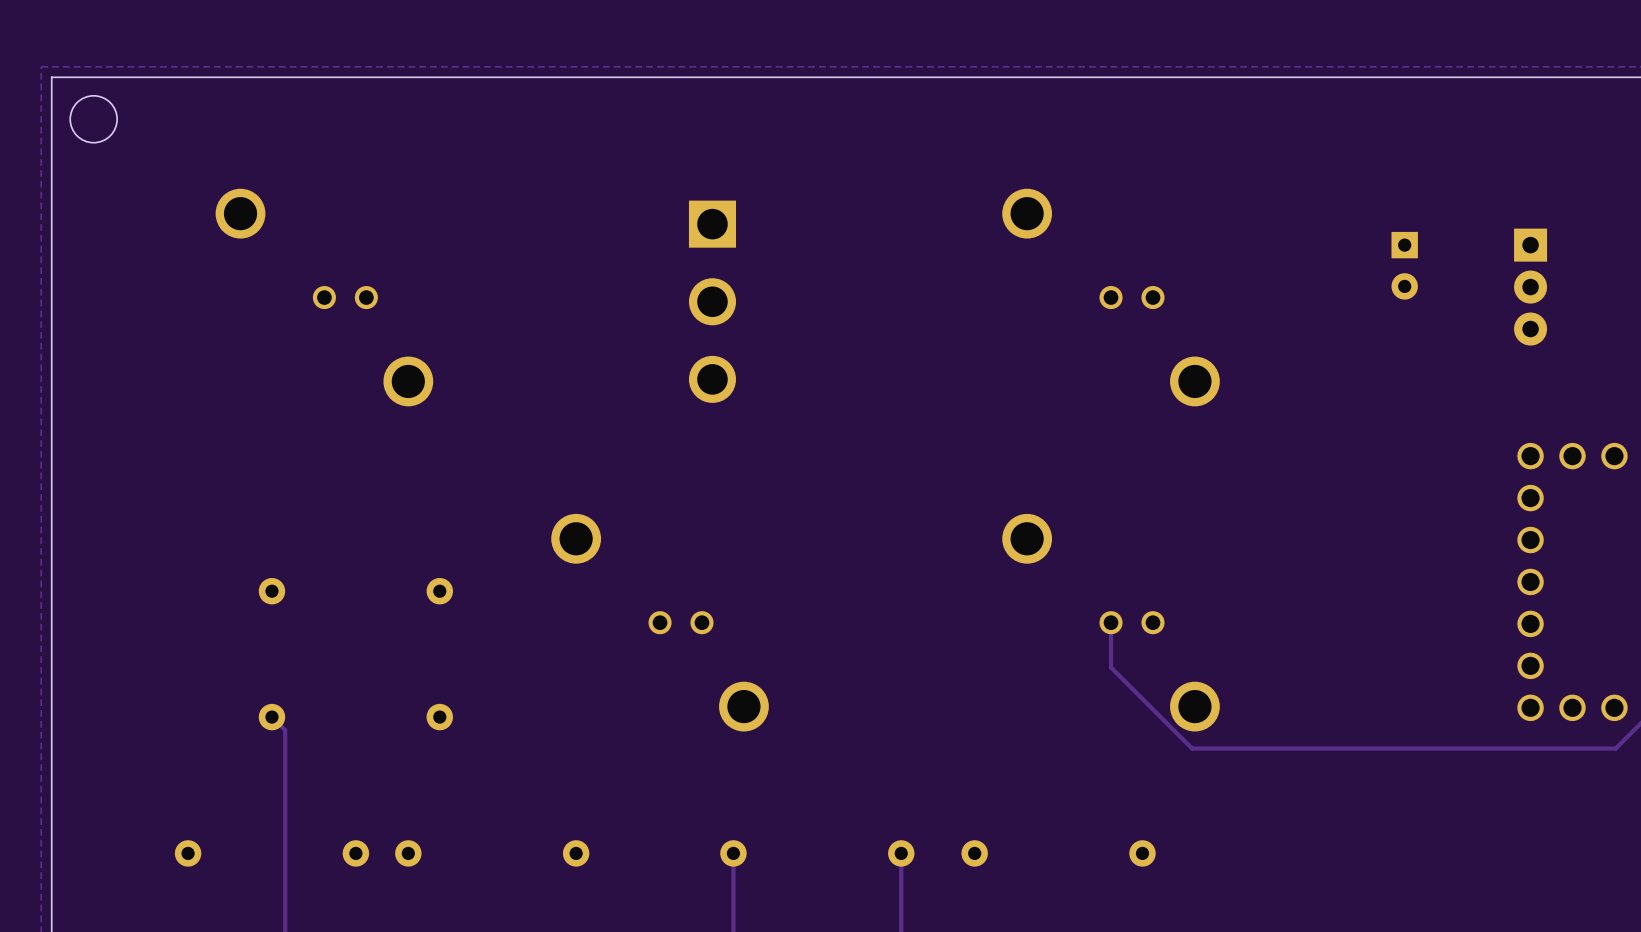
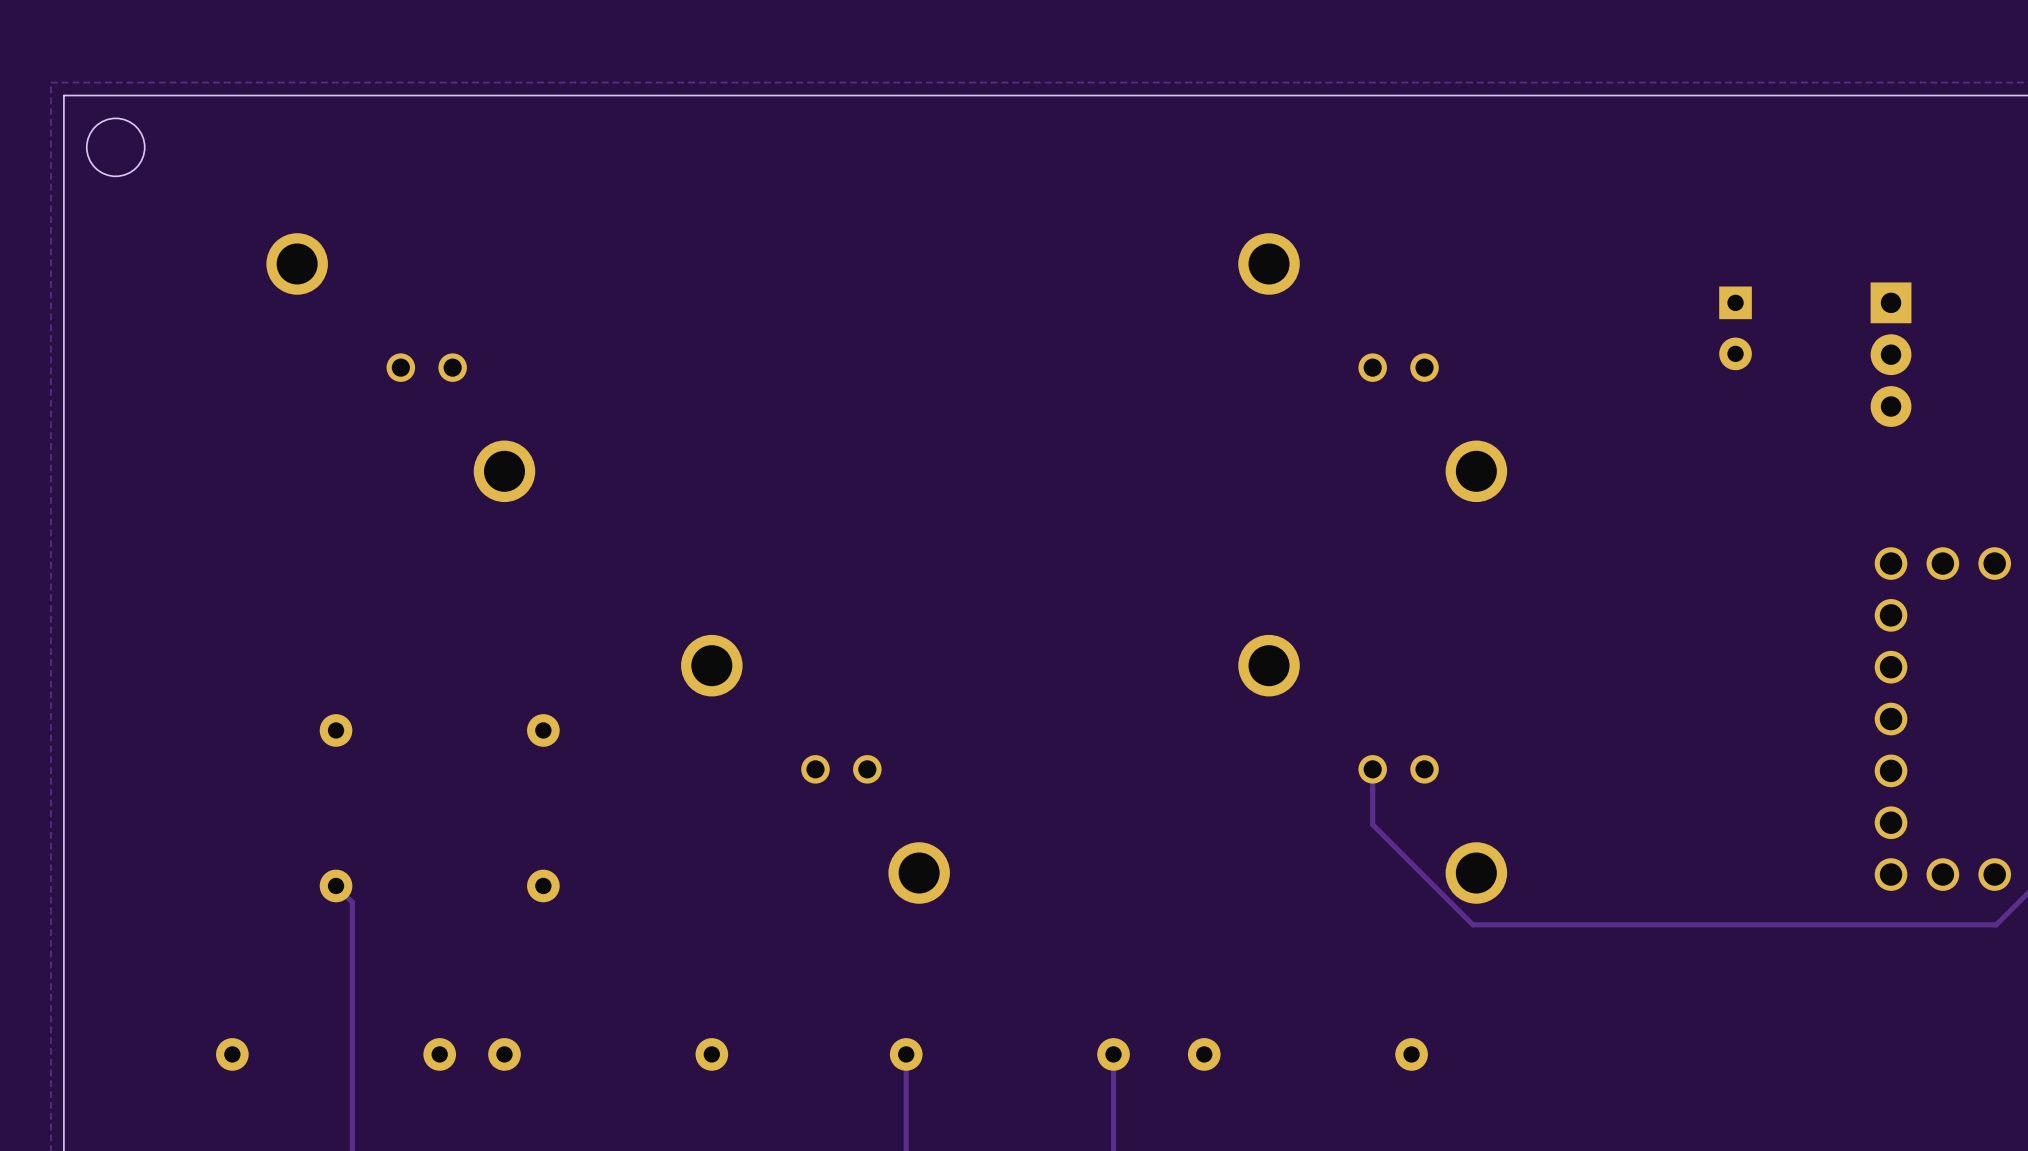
part: (712, 301) -> none

